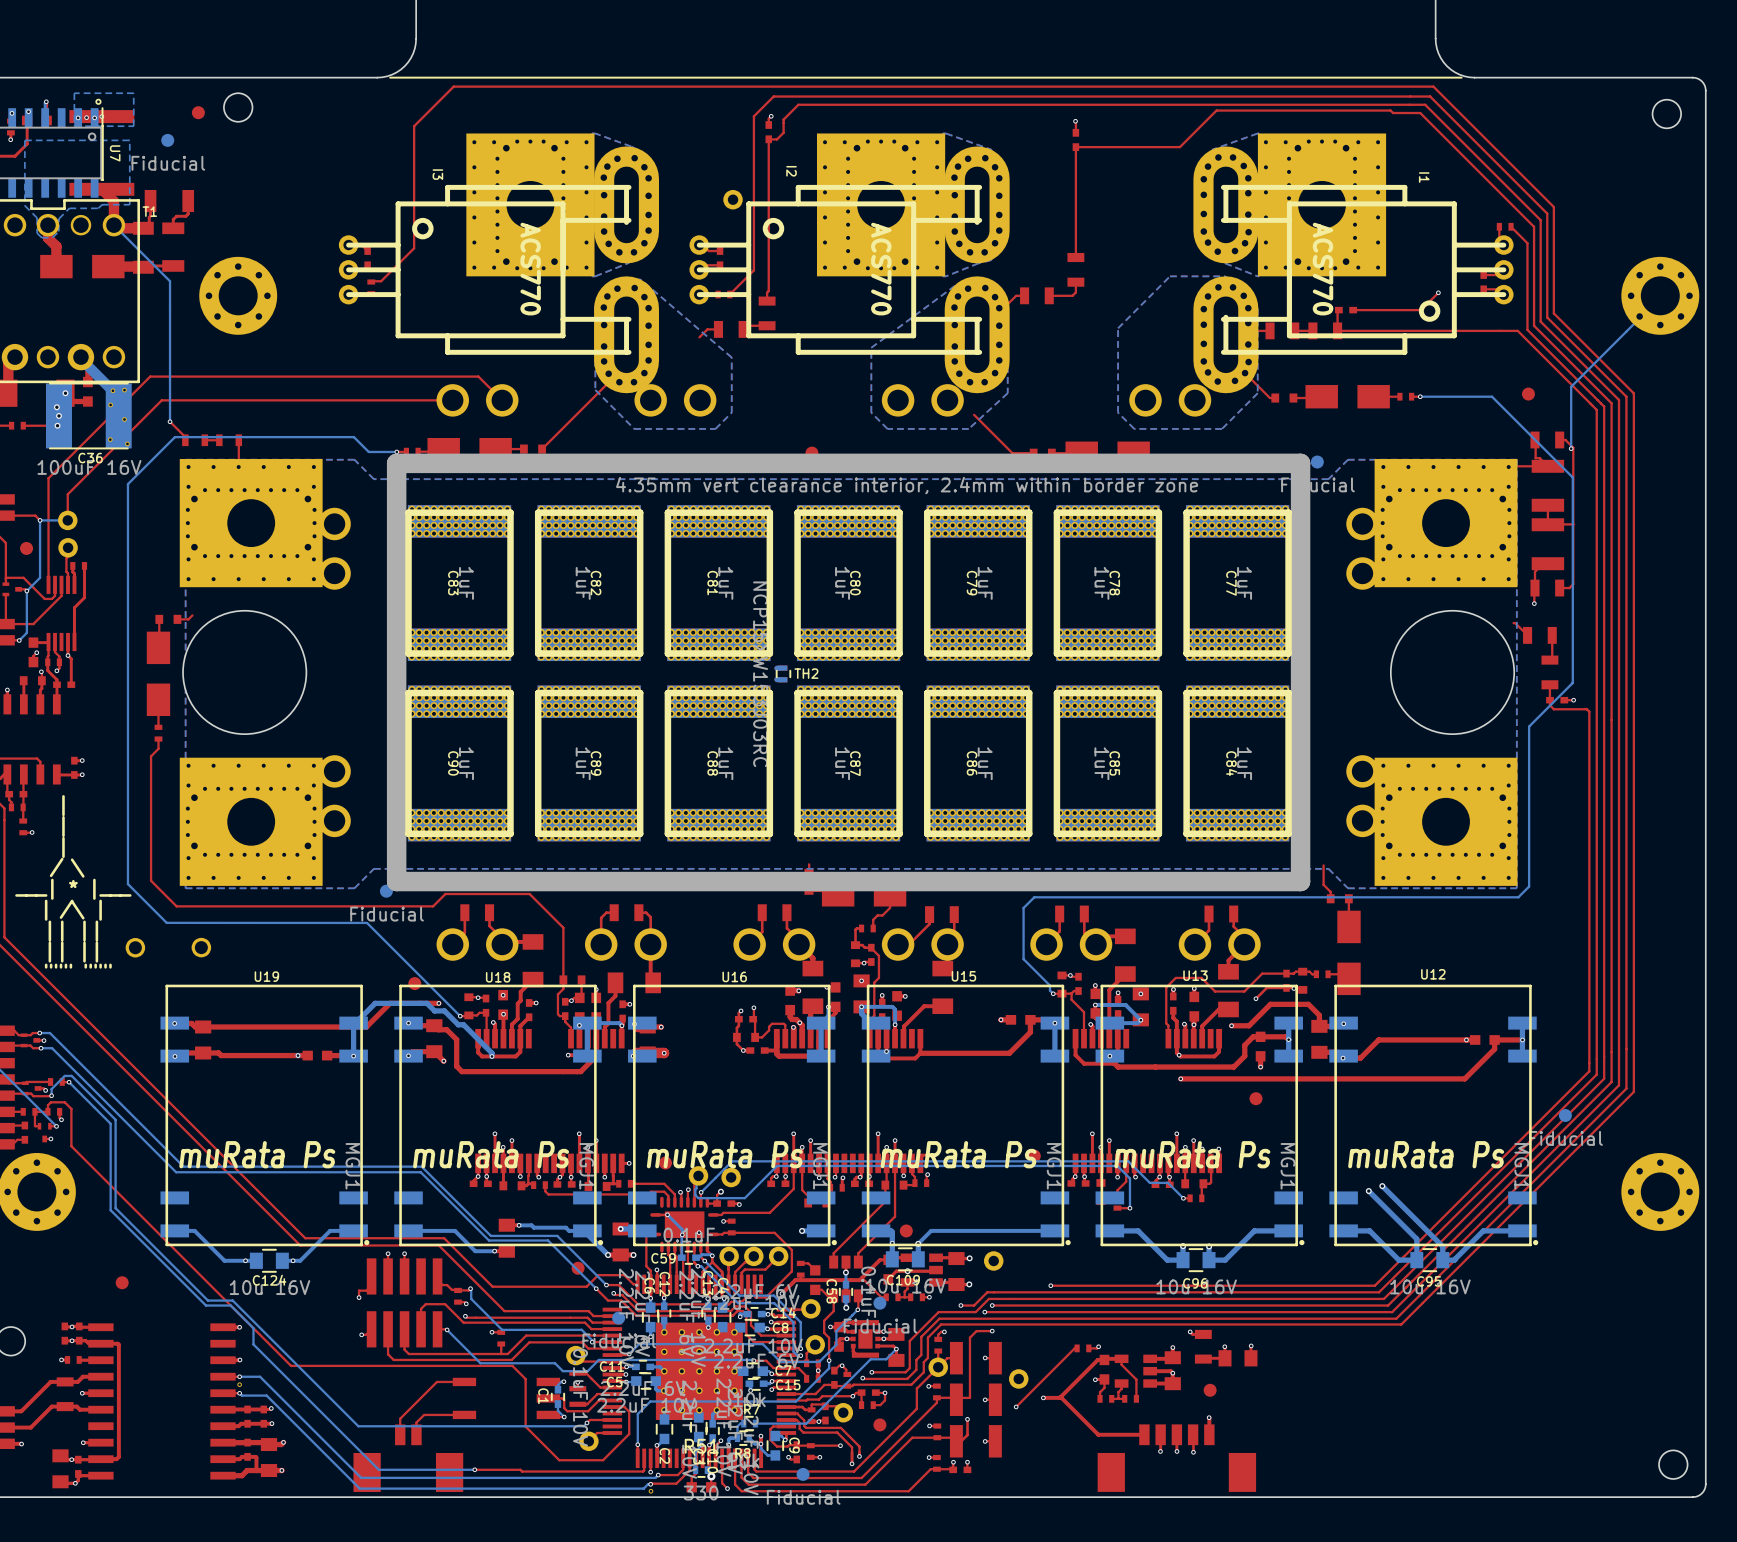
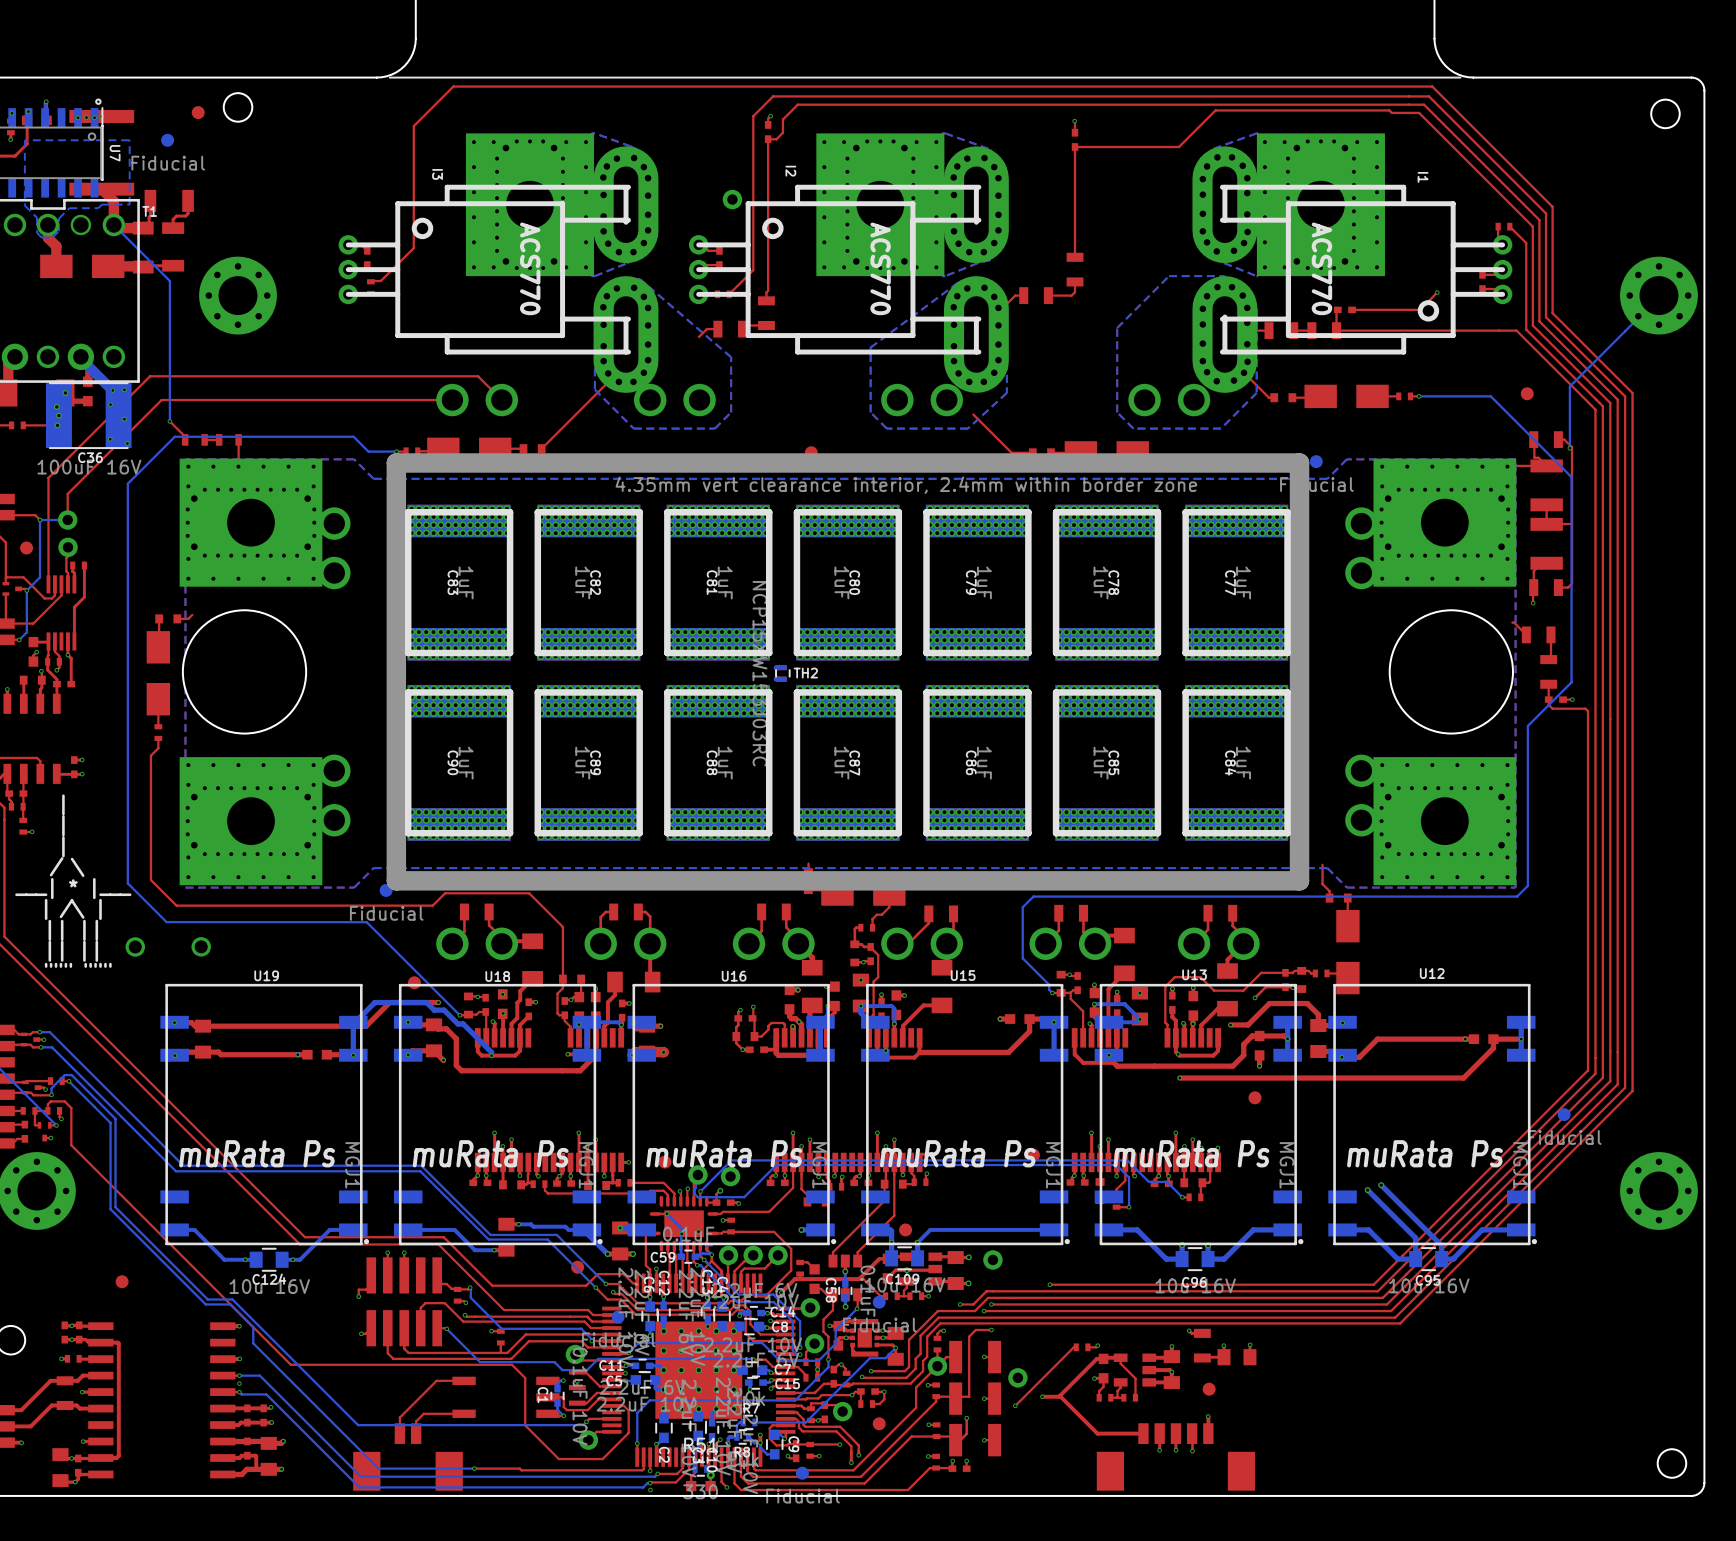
bottom zone outline: (133, 93) (74, 93) (74, 126) (133, 126) (133, 93) -> none
bottom track: none -> (711, 1245) (705, 1245)

